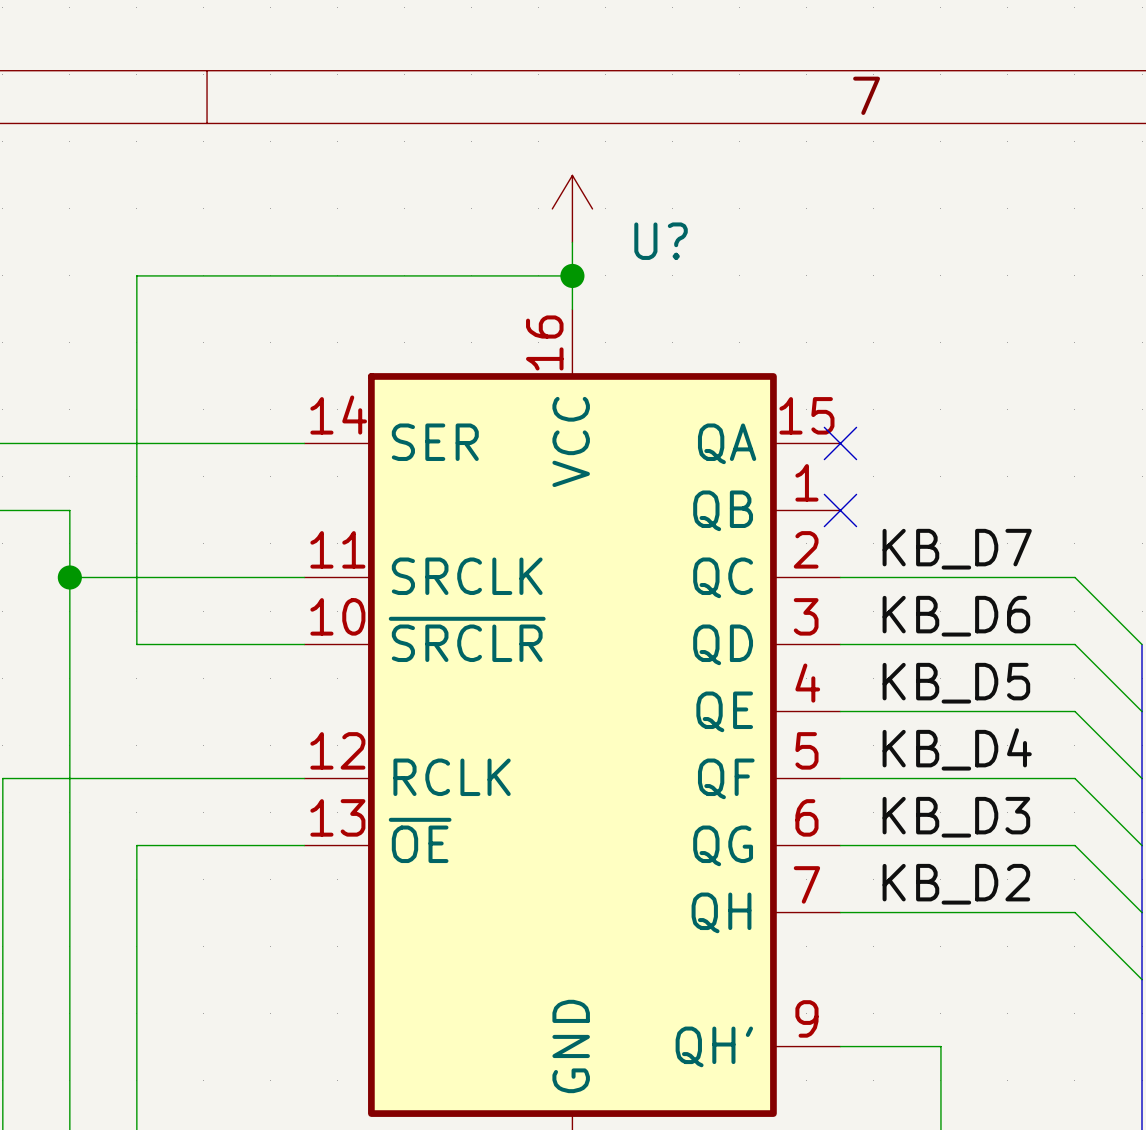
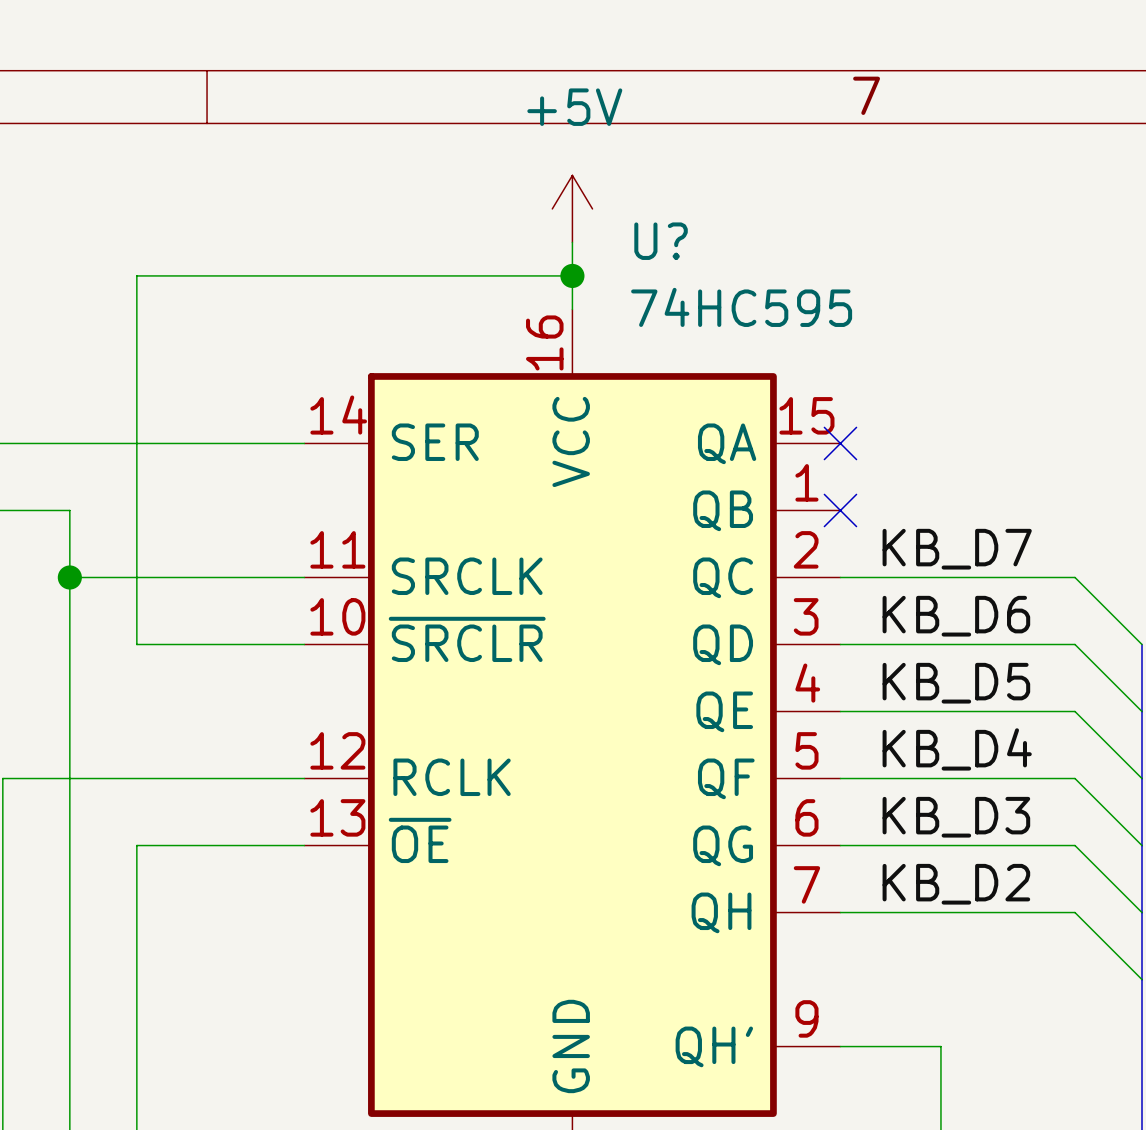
power symbol text: none -> +5V (574, 107)
U? value: none -> 74HC595 (741, 307)

